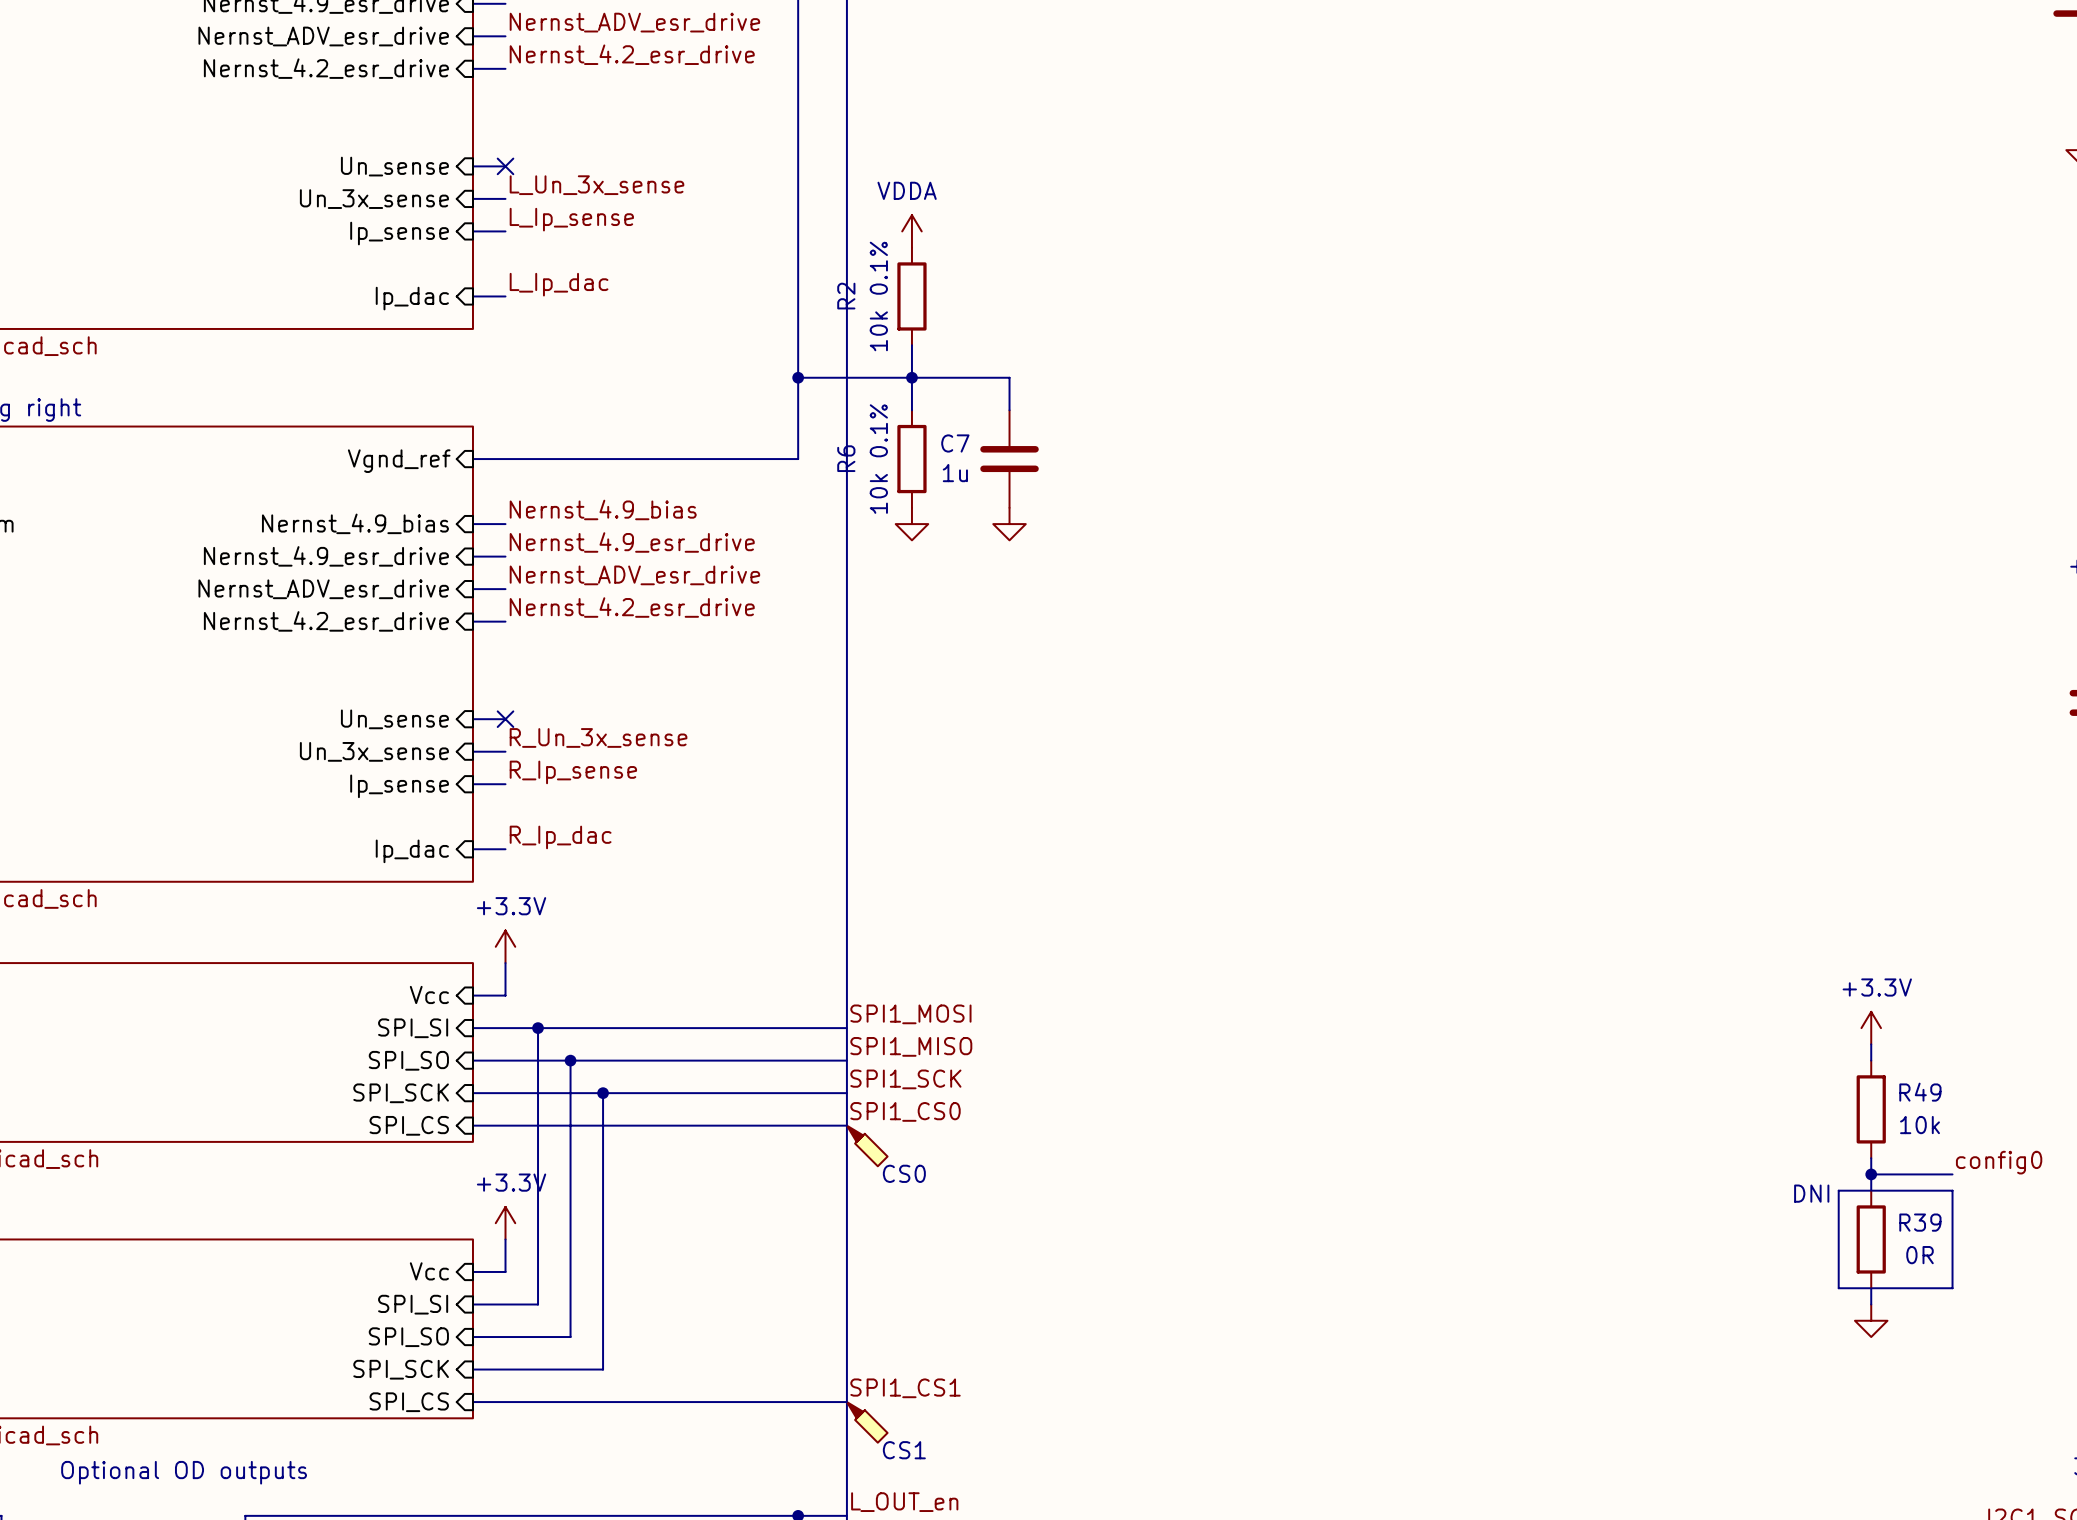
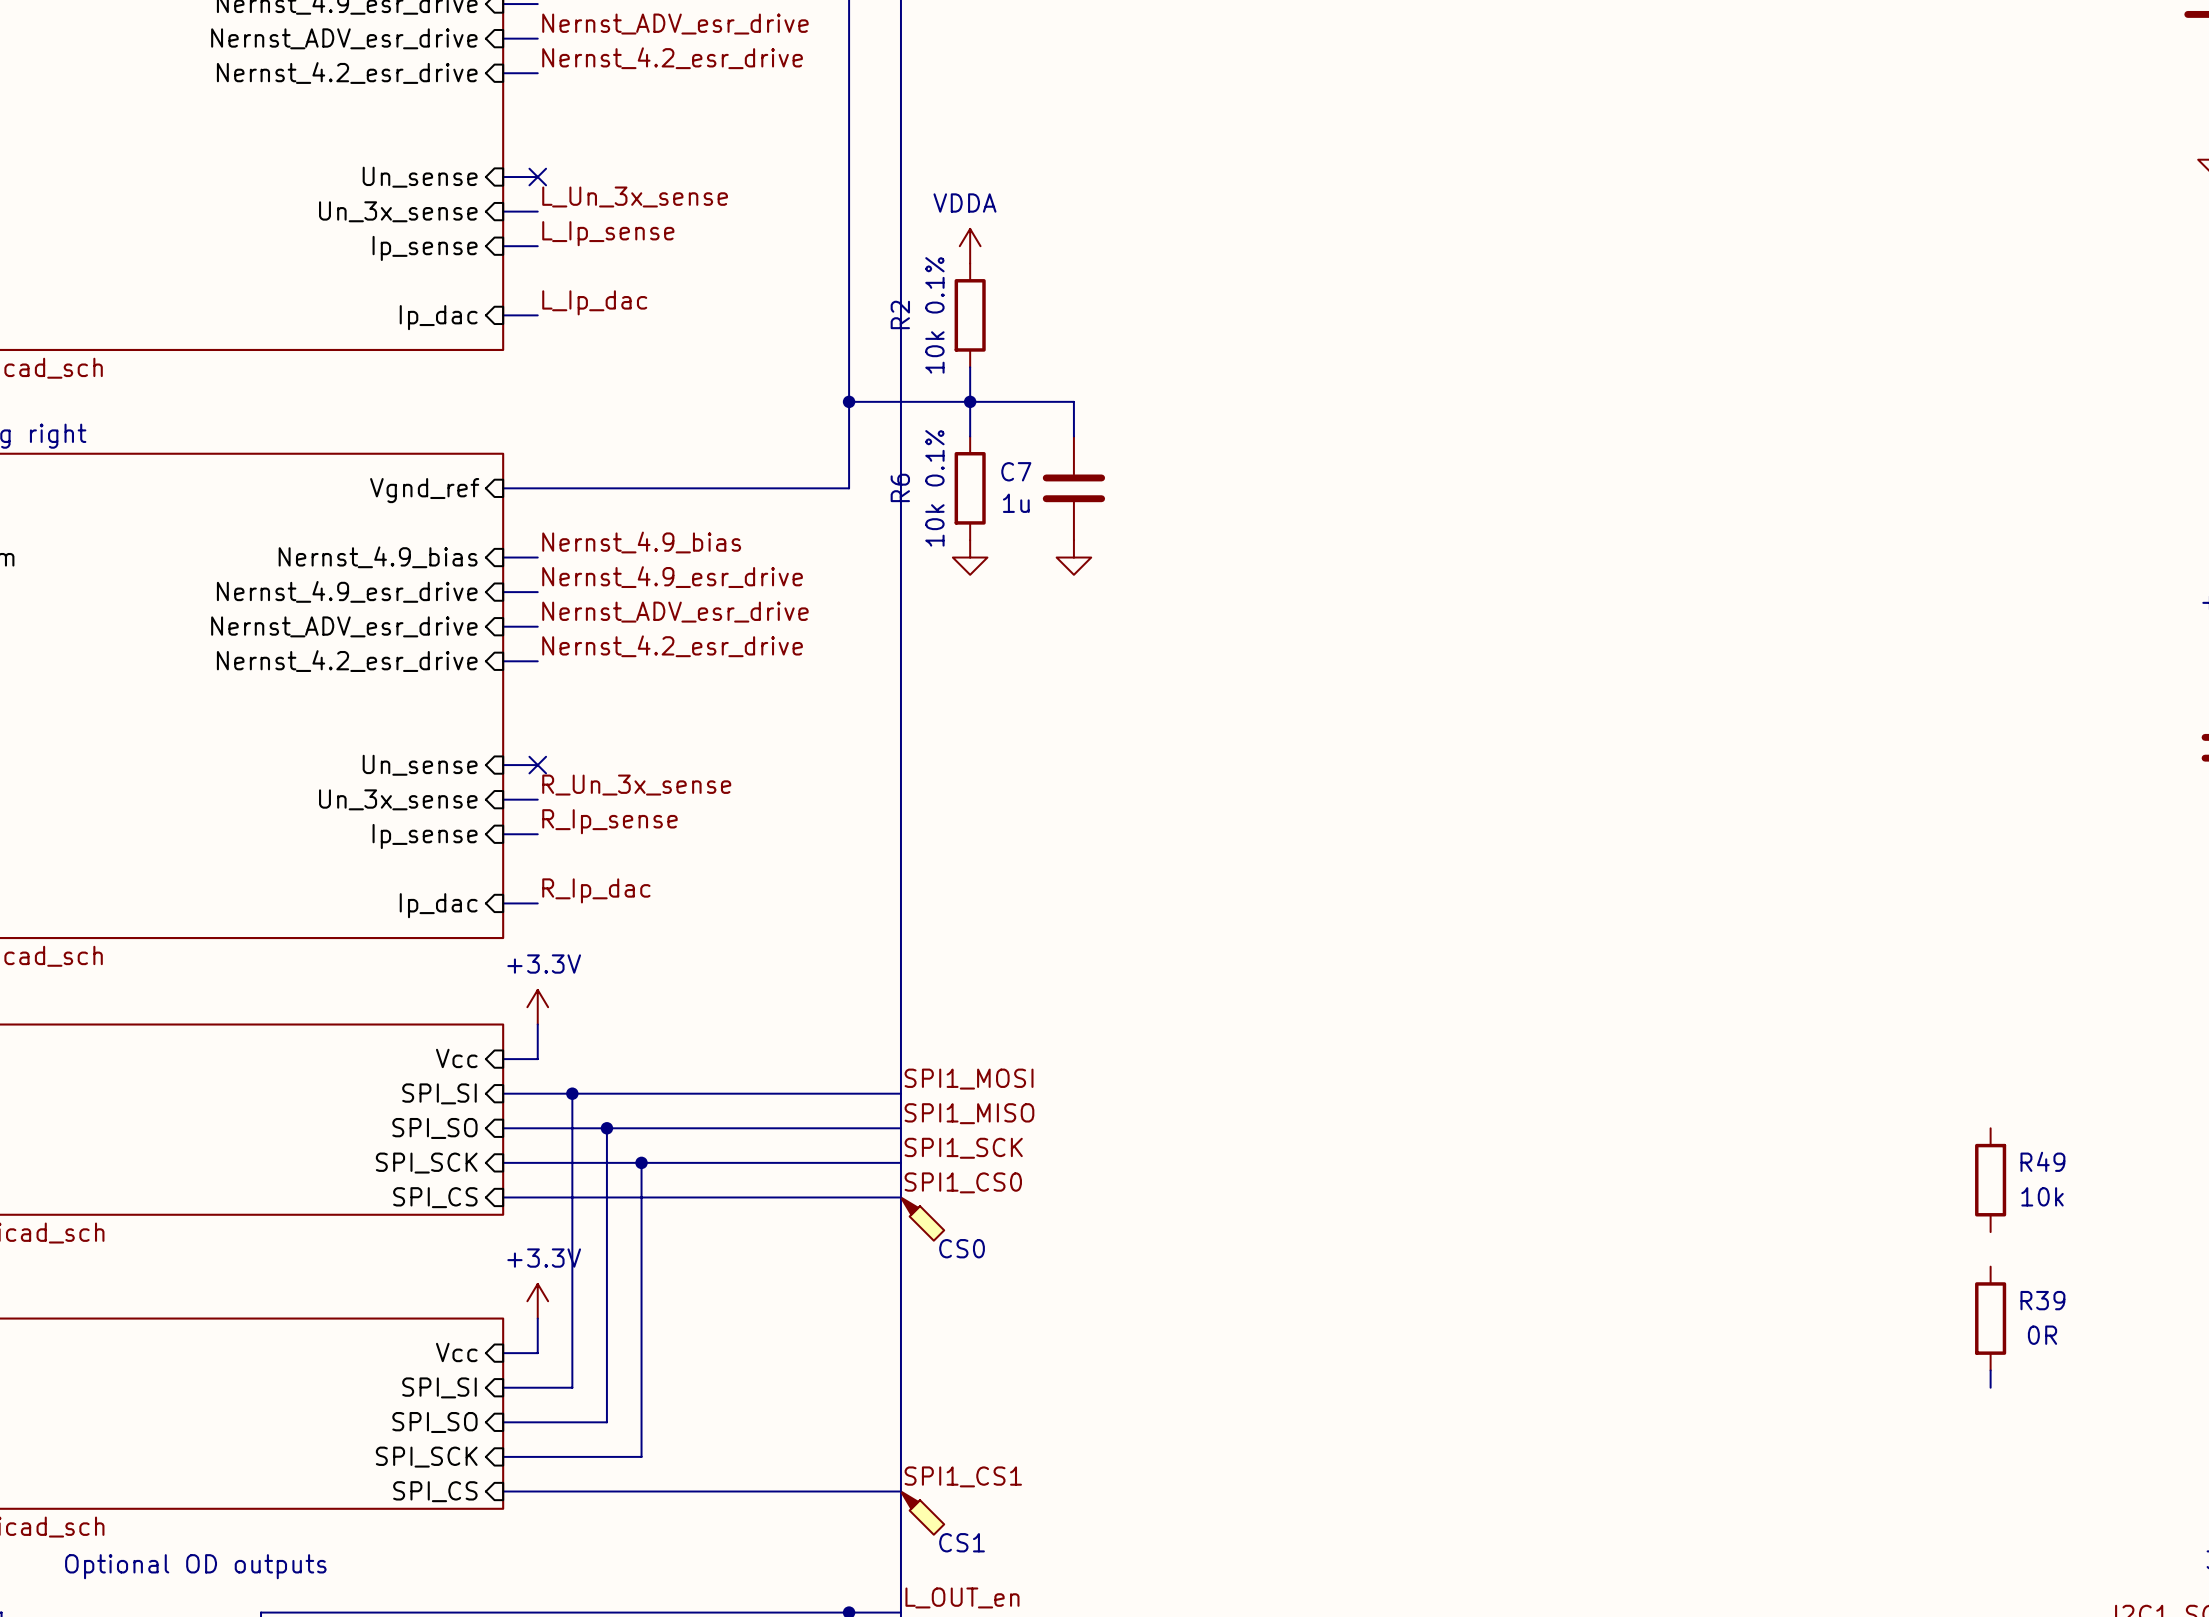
power symbol: +3.3V (1871, 1028) -> none
wire: (1871, 1044) (1871, 1060) -> none
wire: (1871, 1158) (1871, 1190) -> none
label: config0 (1999, 1162) -> none
wire: (1871, 1174) (1952, 1174) -> none
junction: (1871, 1174) -> none
line: (1838, 1190) (1952, 1190) (1952, 1288) (1838, 1288) (1838, 1190) -> none
text: DNI (1811, 1193) -> none
power symbol: (1871, 1320) -> none

